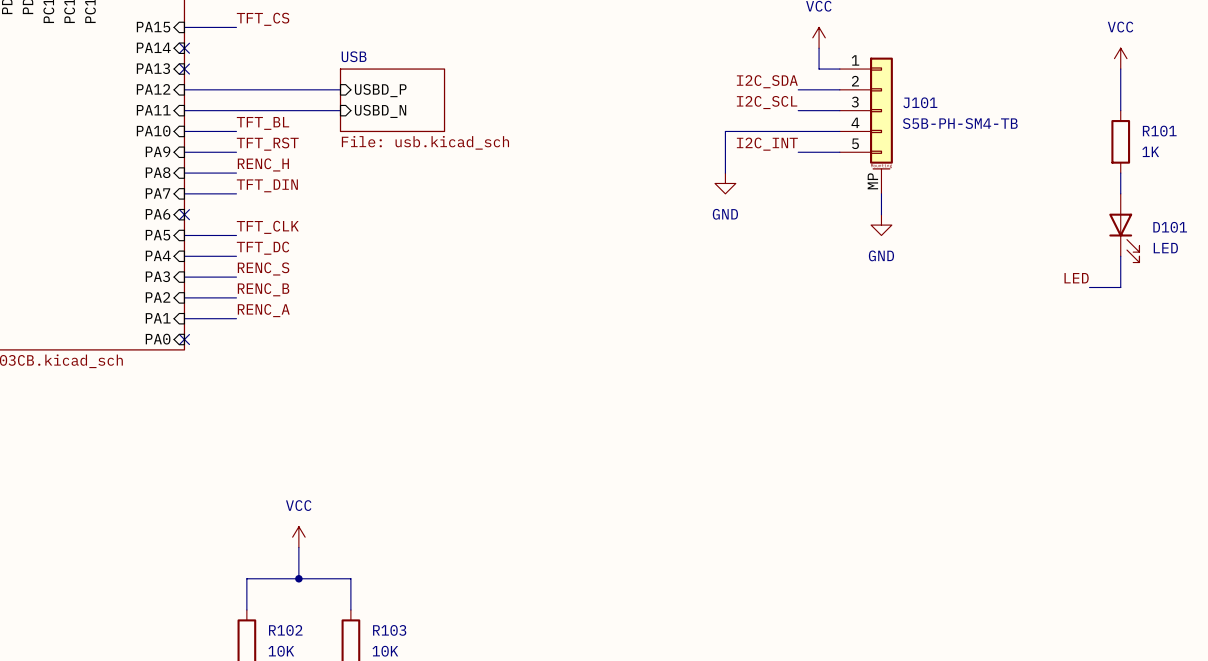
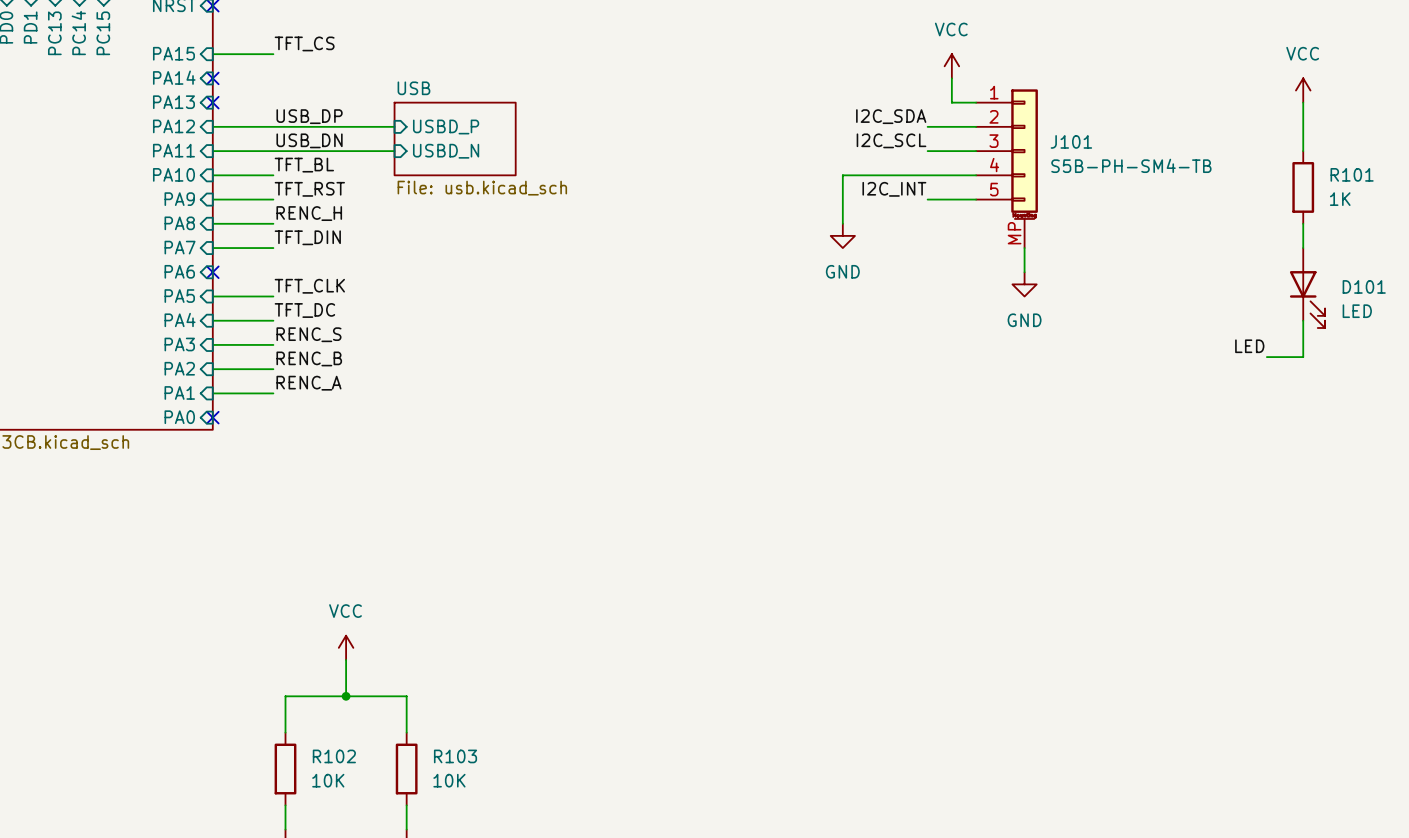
label: none -> USB_DP (309, 116)
label: none -> USB_DN (309, 140)

